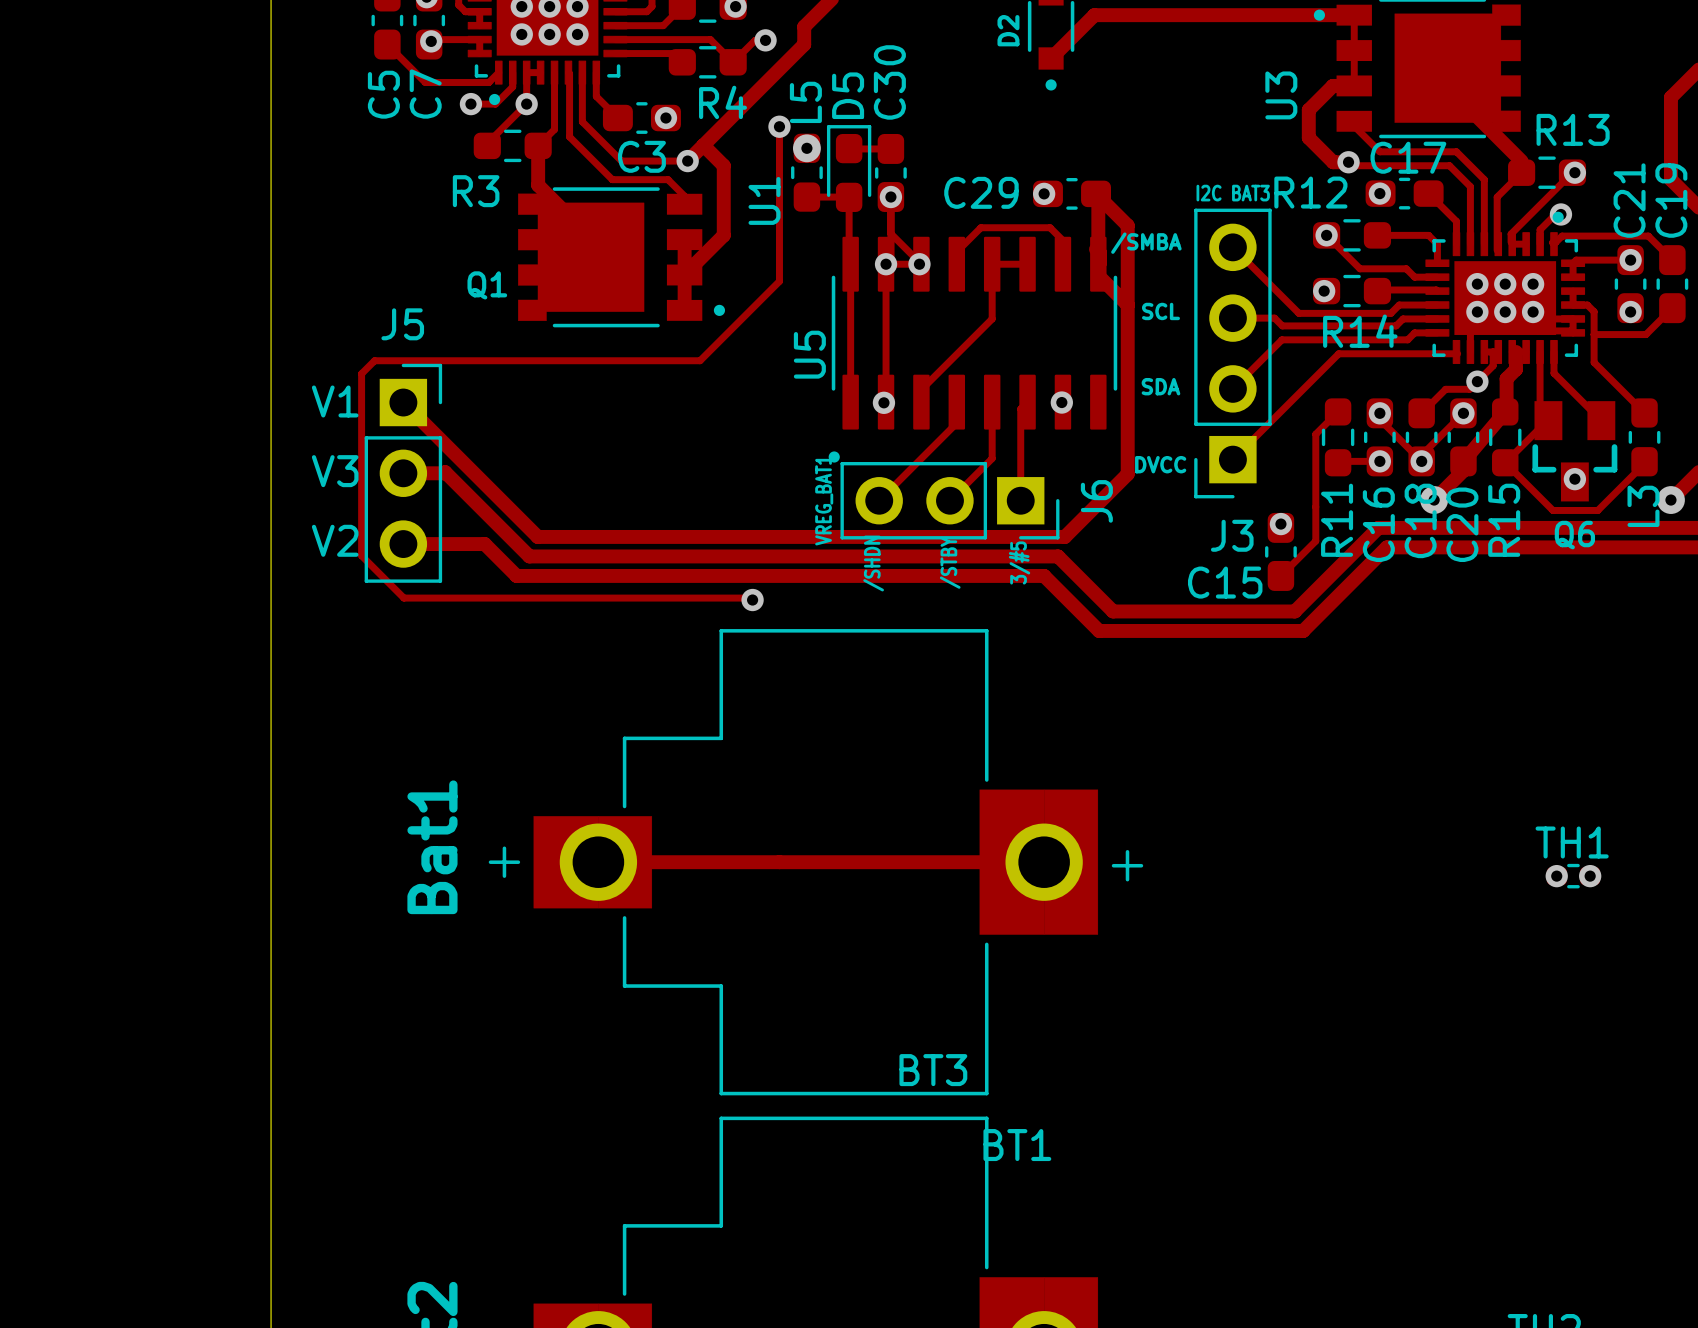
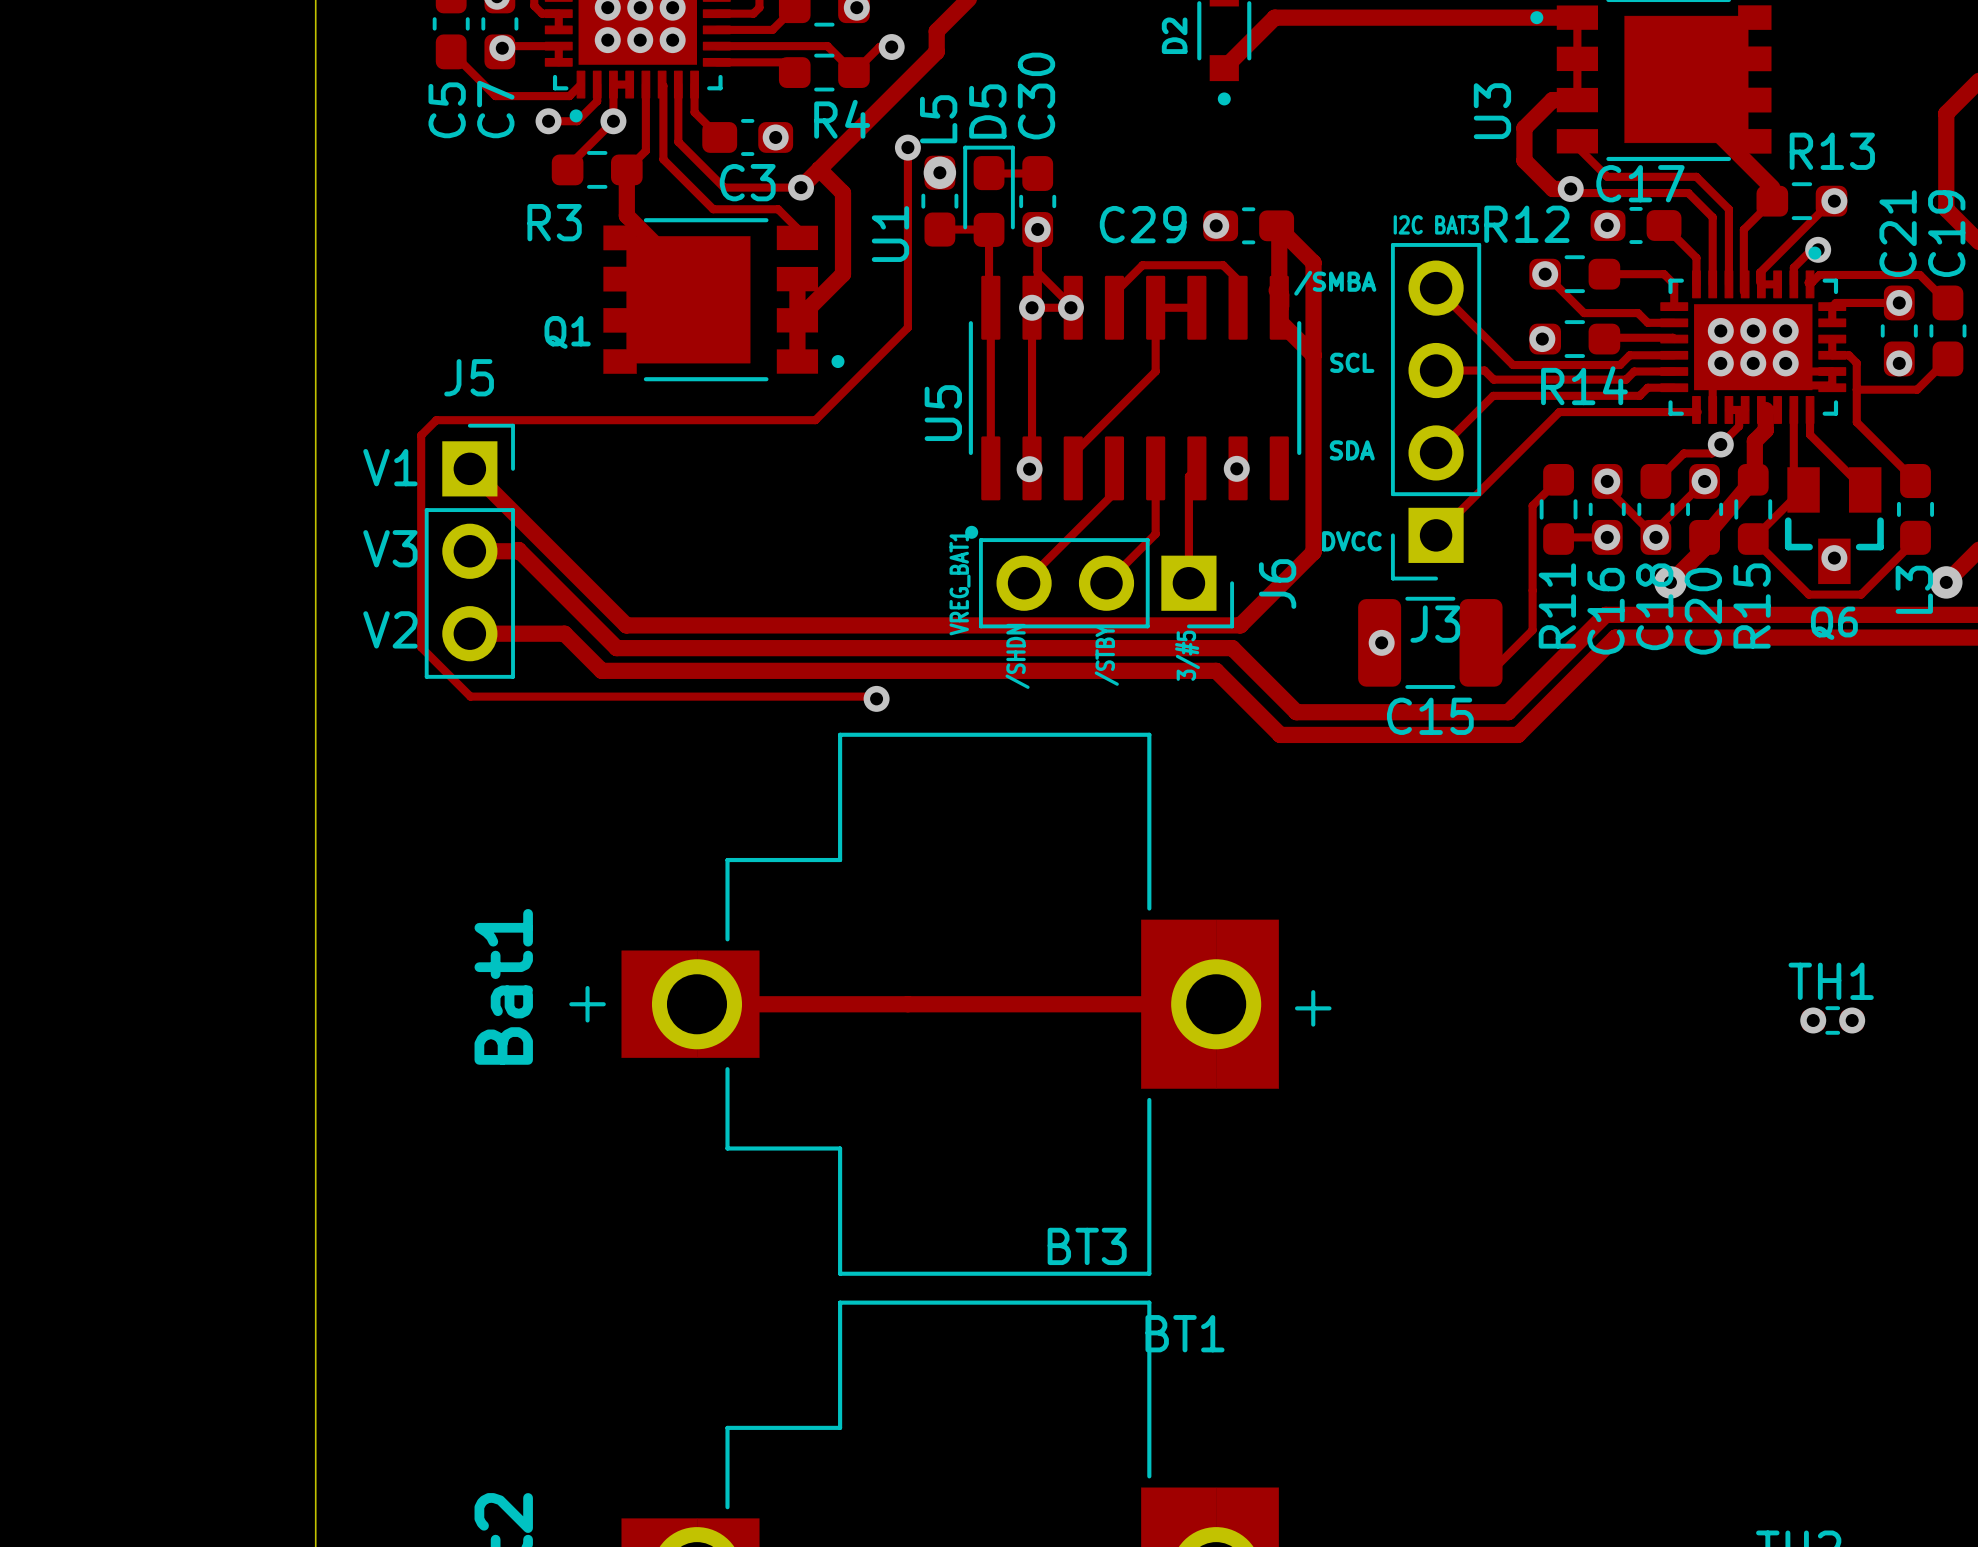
C15 footprint: [1265, 512, 1297, 591] -> [1358, 596, 1503, 689]
via position: (1280, 524) -> (1381, 642)
C15 name position: C15 (1225, 582) -> C15 (1430, 716)

